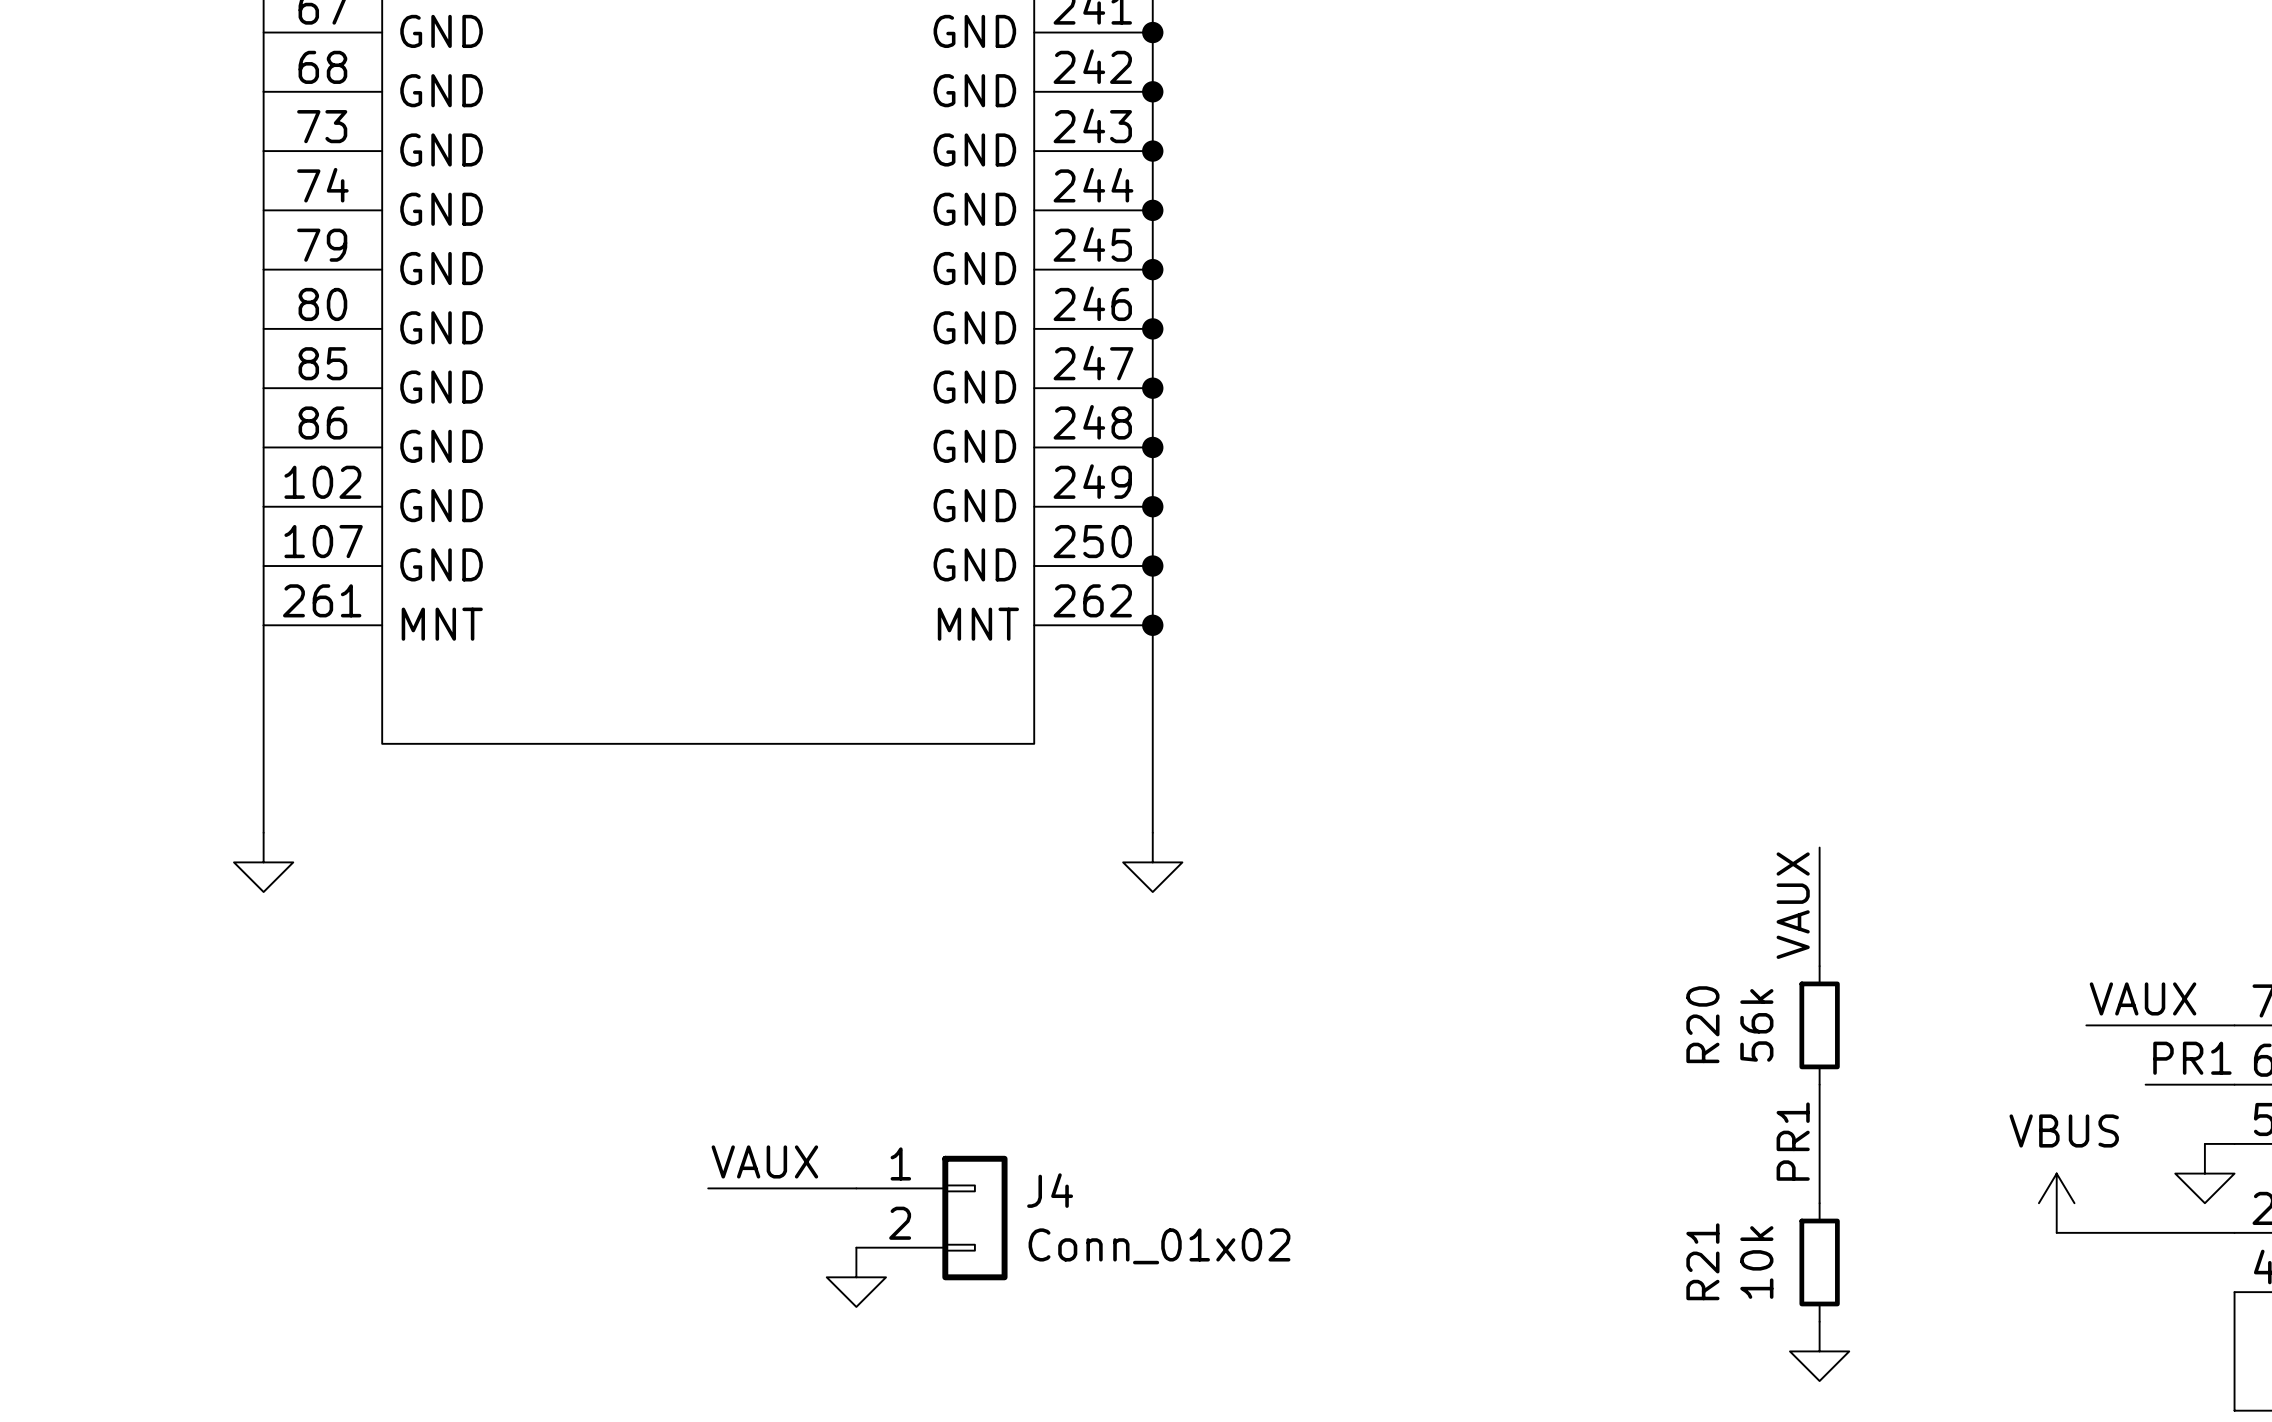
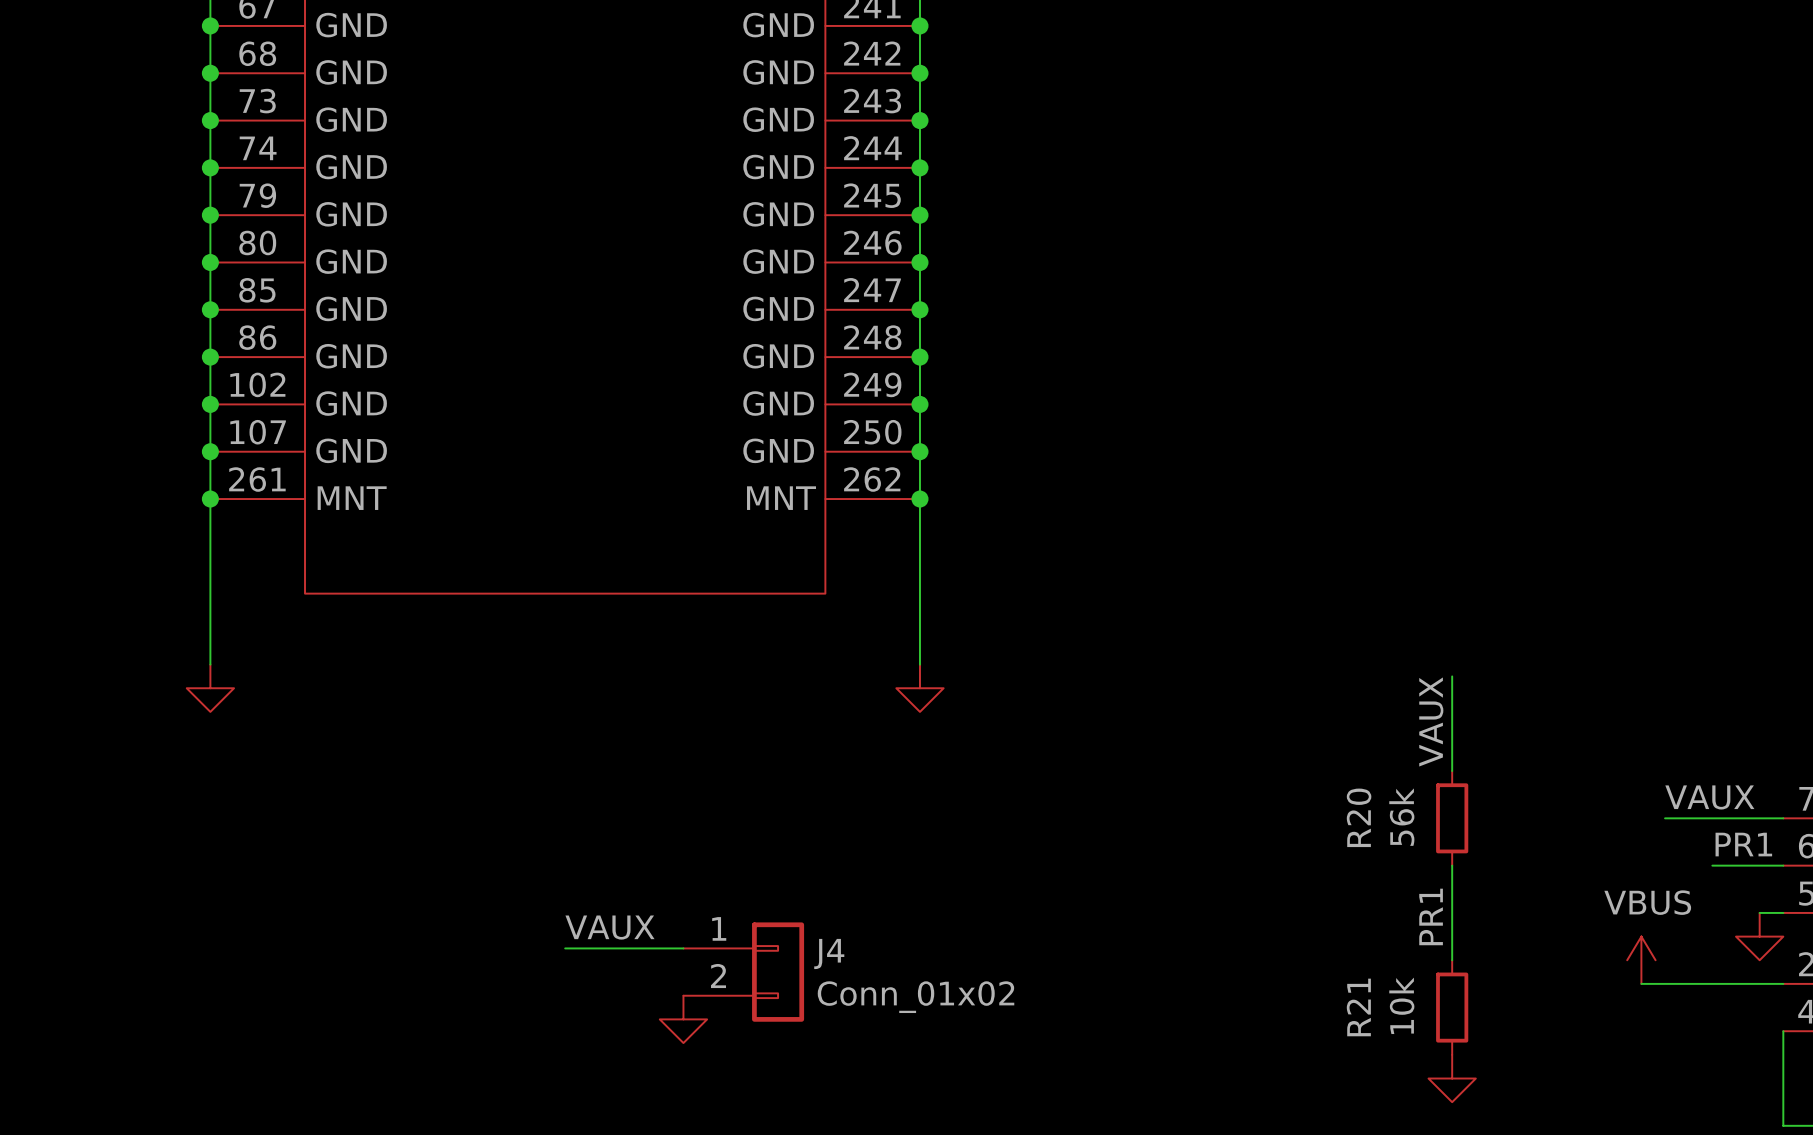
junction: none -> (210, 25)
junction: none -> (210, 73)
junction: none -> (210, 120)
junction: none -> (210, 167)
junction: none -> (210, 215)
junction: none -> (210, 262)
junction: none -> (210, 309)
junction: none -> (210, 357)
junction: none -> (210, 404)
junction: none -> (210, 451)
junction: none -> (210, 499)

